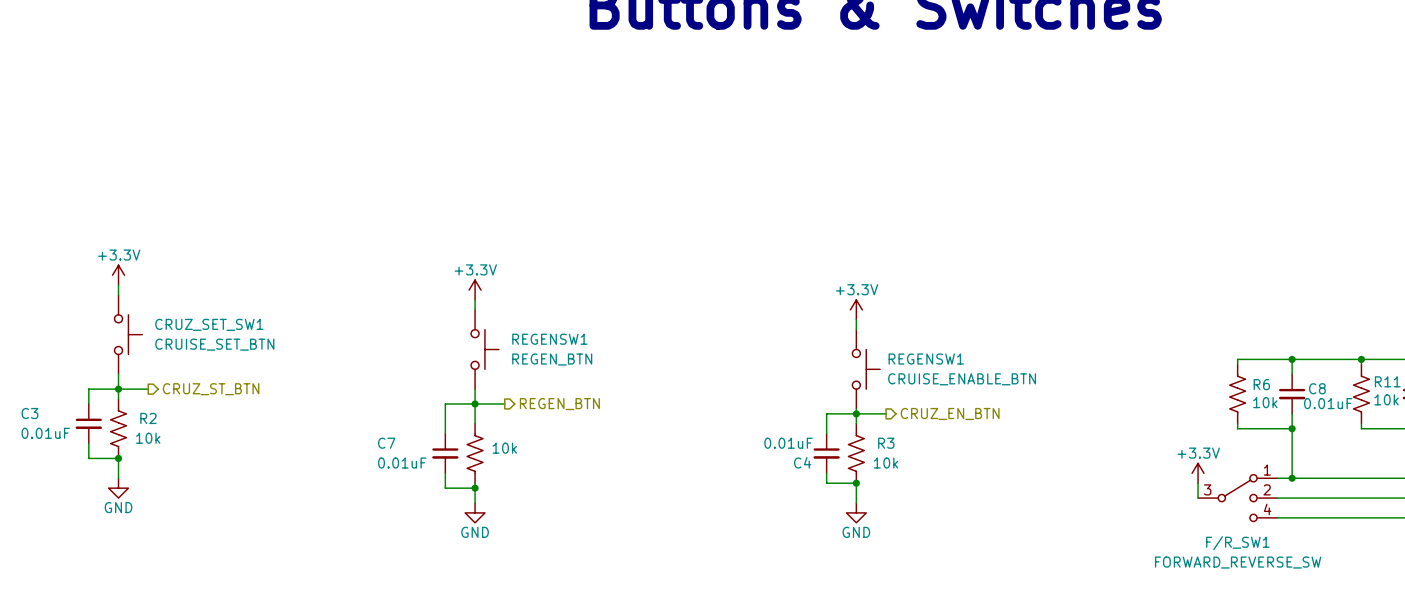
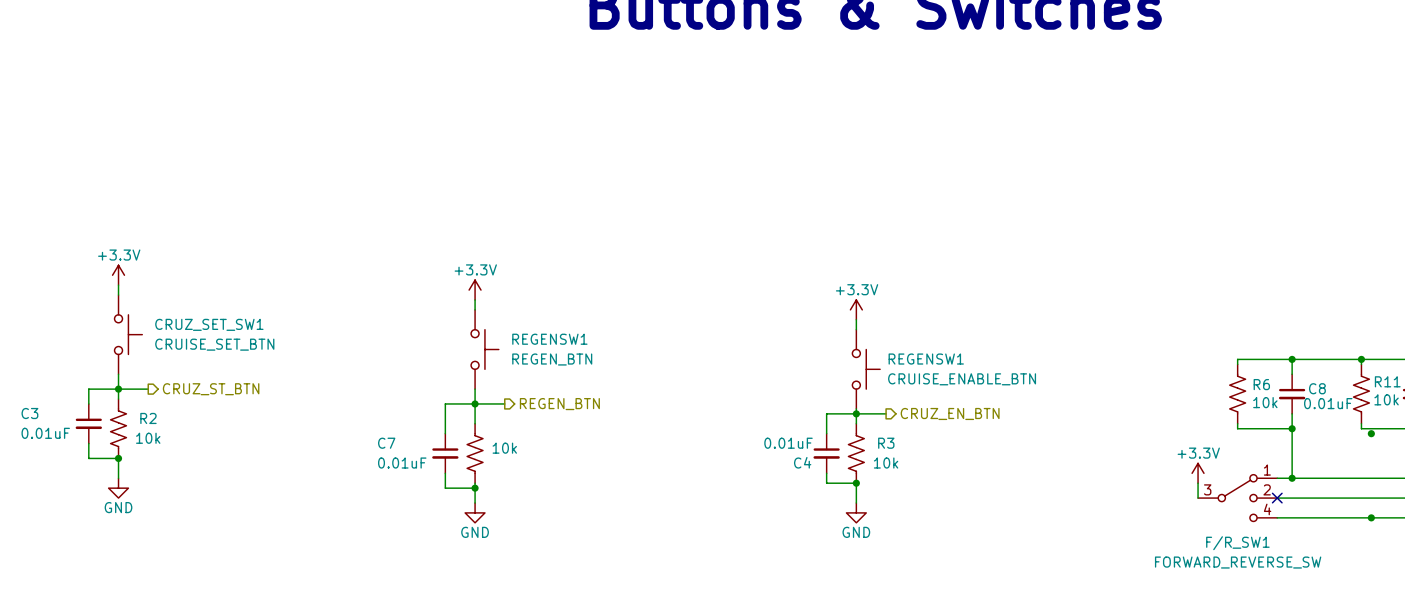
junction: none -> (1371, 433)
no-connect mark: none -> (1277, 498)
junction: none -> (1371, 517)

